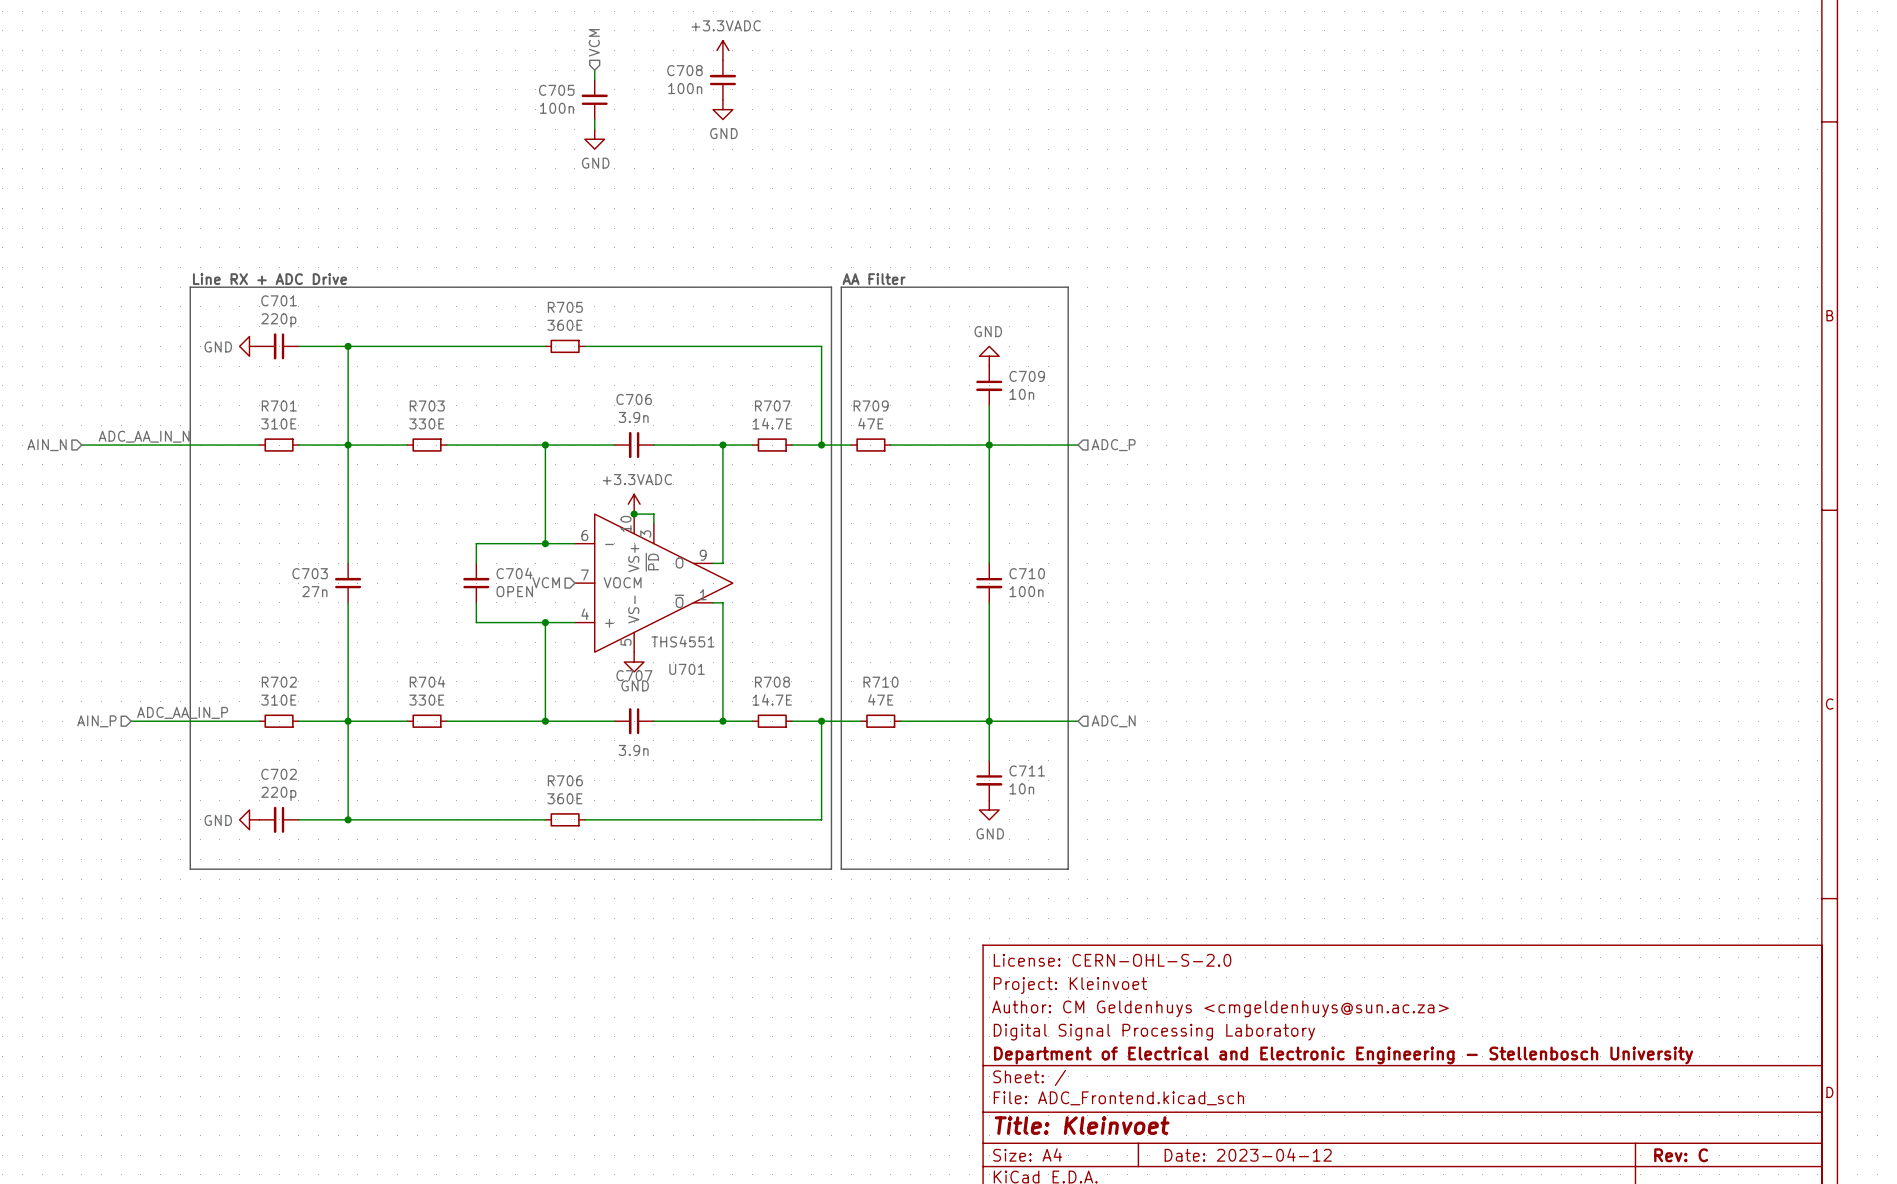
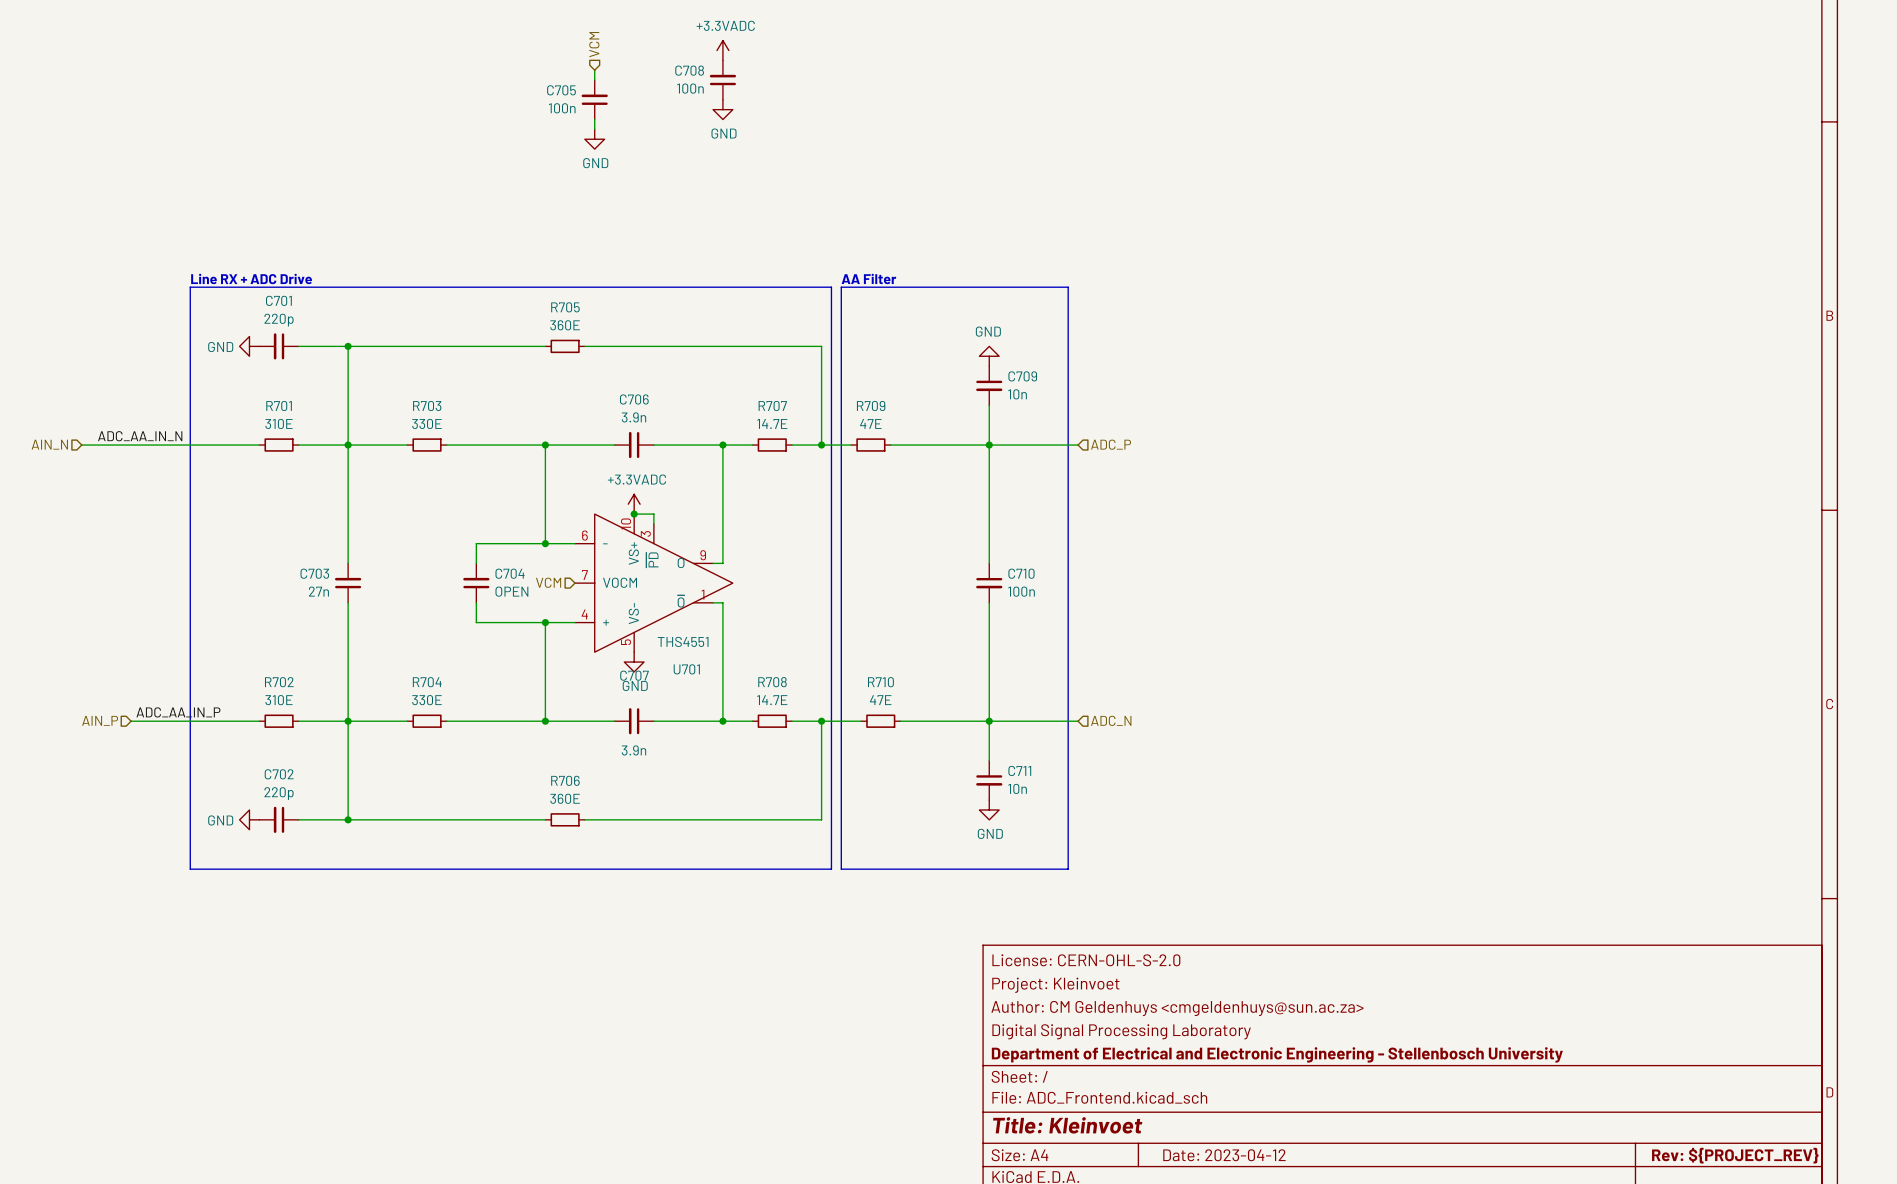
title block: Rev: C (1681, 1155) -> Rev: ${PROJECT_REV} (1735, 1155)

